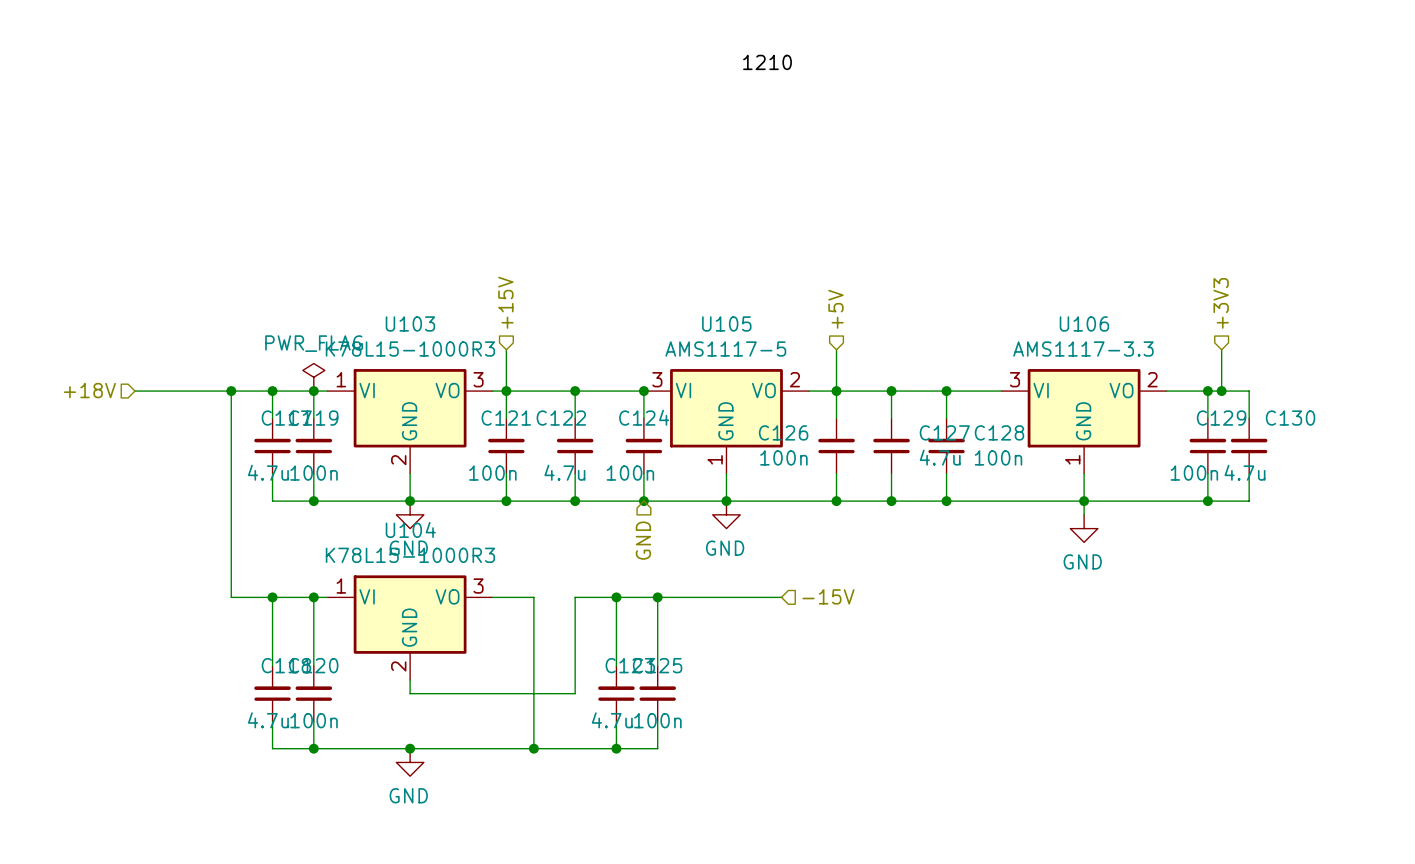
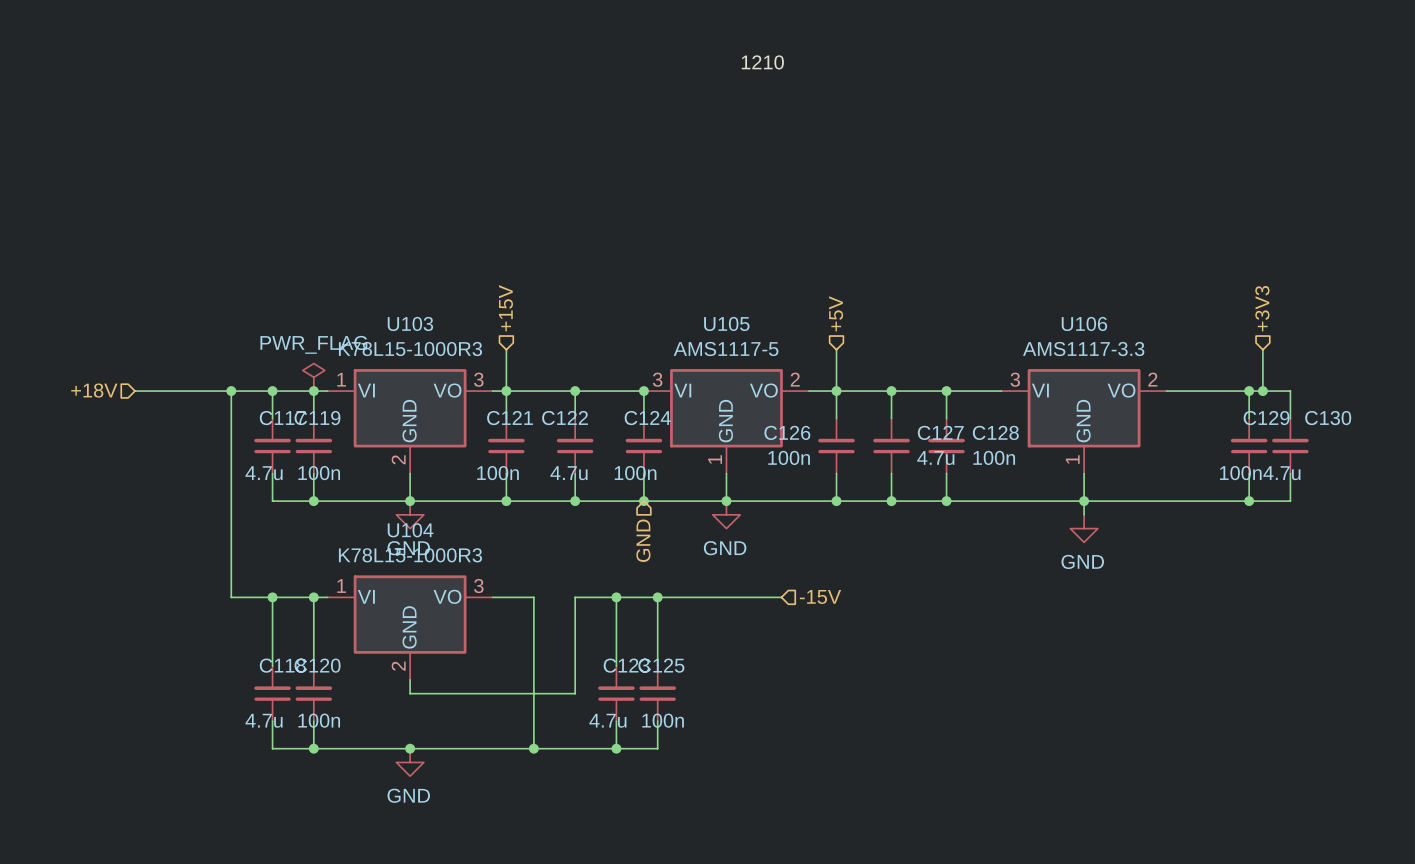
hierarchical label position: +3V3 (1221, 303) -> +3V3 (1262, 308)
wire: (1221, 349) (1221, 391) -> (1262, 349) (1262, 391)
wire: (1207, 391) (1207, 418) -> none
junction: (1207, 391) -> none
junction: (1221, 391) -> none
wire: none -> (1249, 391) (1290, 391) (1290, 418)
junction: none -> (1249, 391)
junction: none -> (1262, 391)
C130 name: C130 (1290, 418) -> C129 (1266, 418)
C129: 100n (1207, 446) -> none
C130: none -> 4.7u (1290, 446)
C130 value: 4.7u (1245, 472) -> 100n (1240, 473)
wire: (1207, 473) (1207, 501) -> none
wire: none -> (1290, 473) (1290, 501) (1249, 501)
junction position: (1207, 501) -> (1249, 501)

